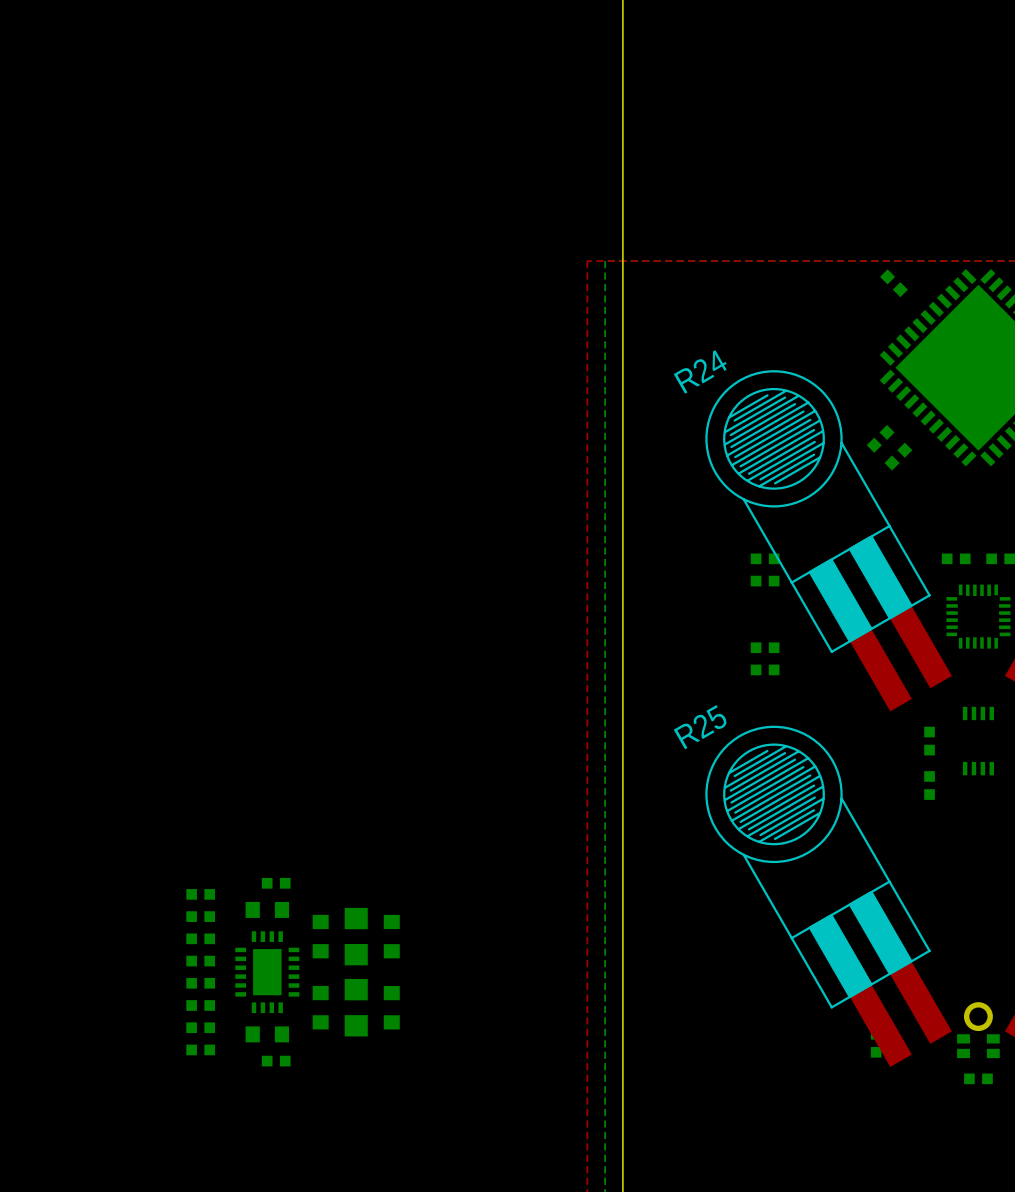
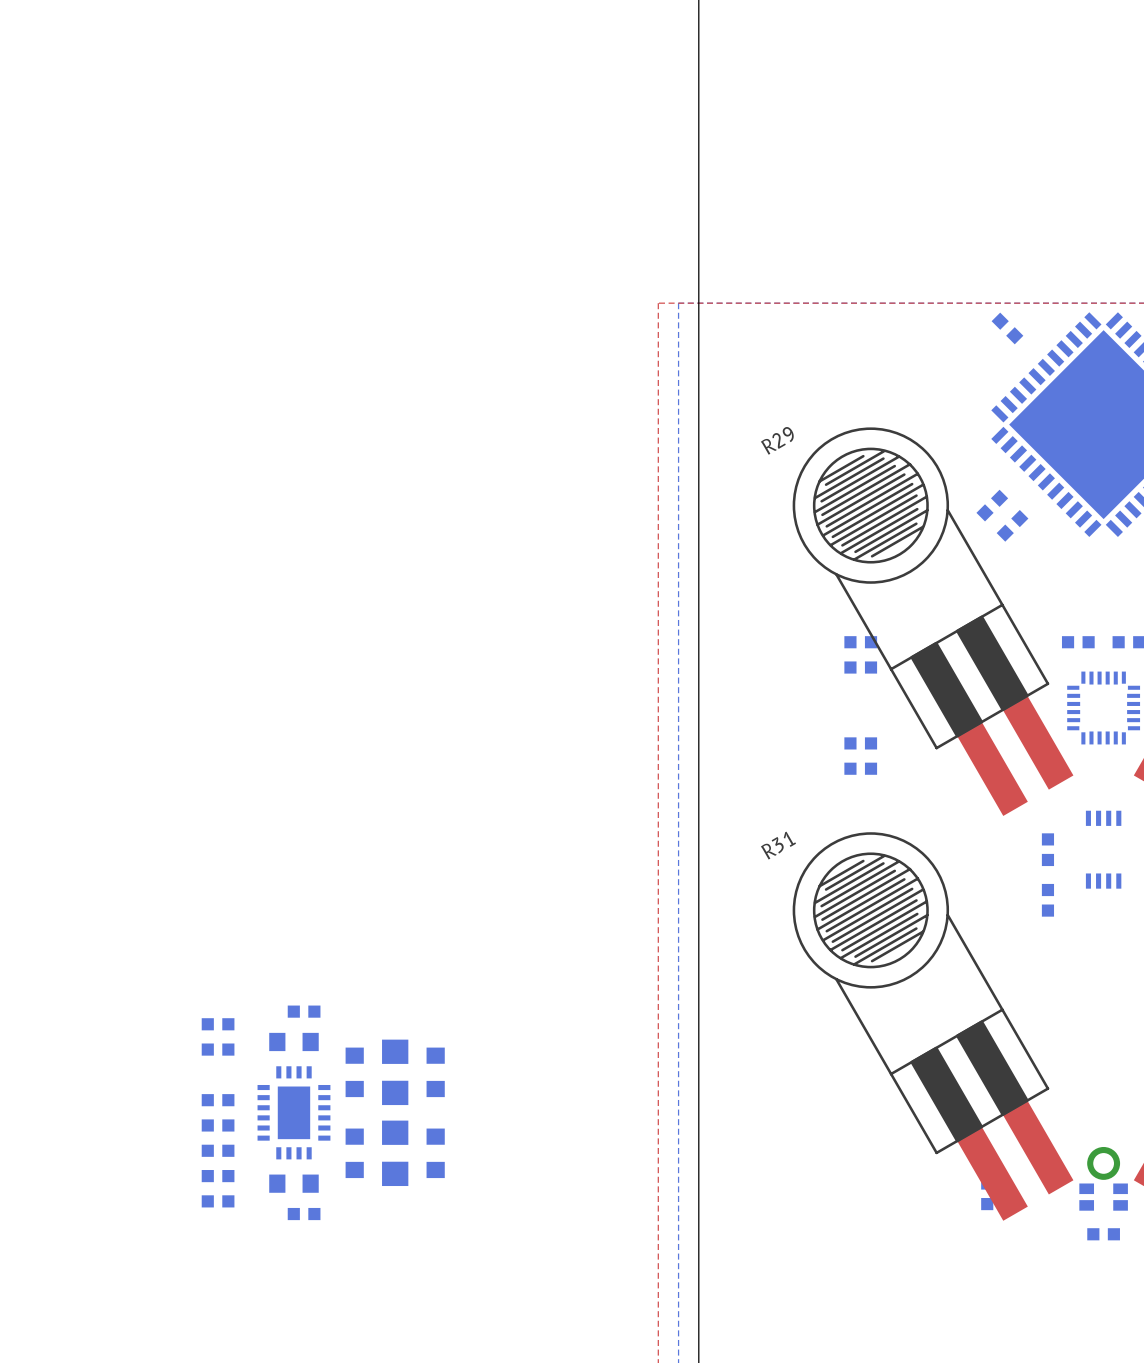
R24 name: R24 (700, 371) -> R29 (777, 440)
R25 name: R25 (700, 727) -> R31 (778, 845)
part: (200, 938) -> none

